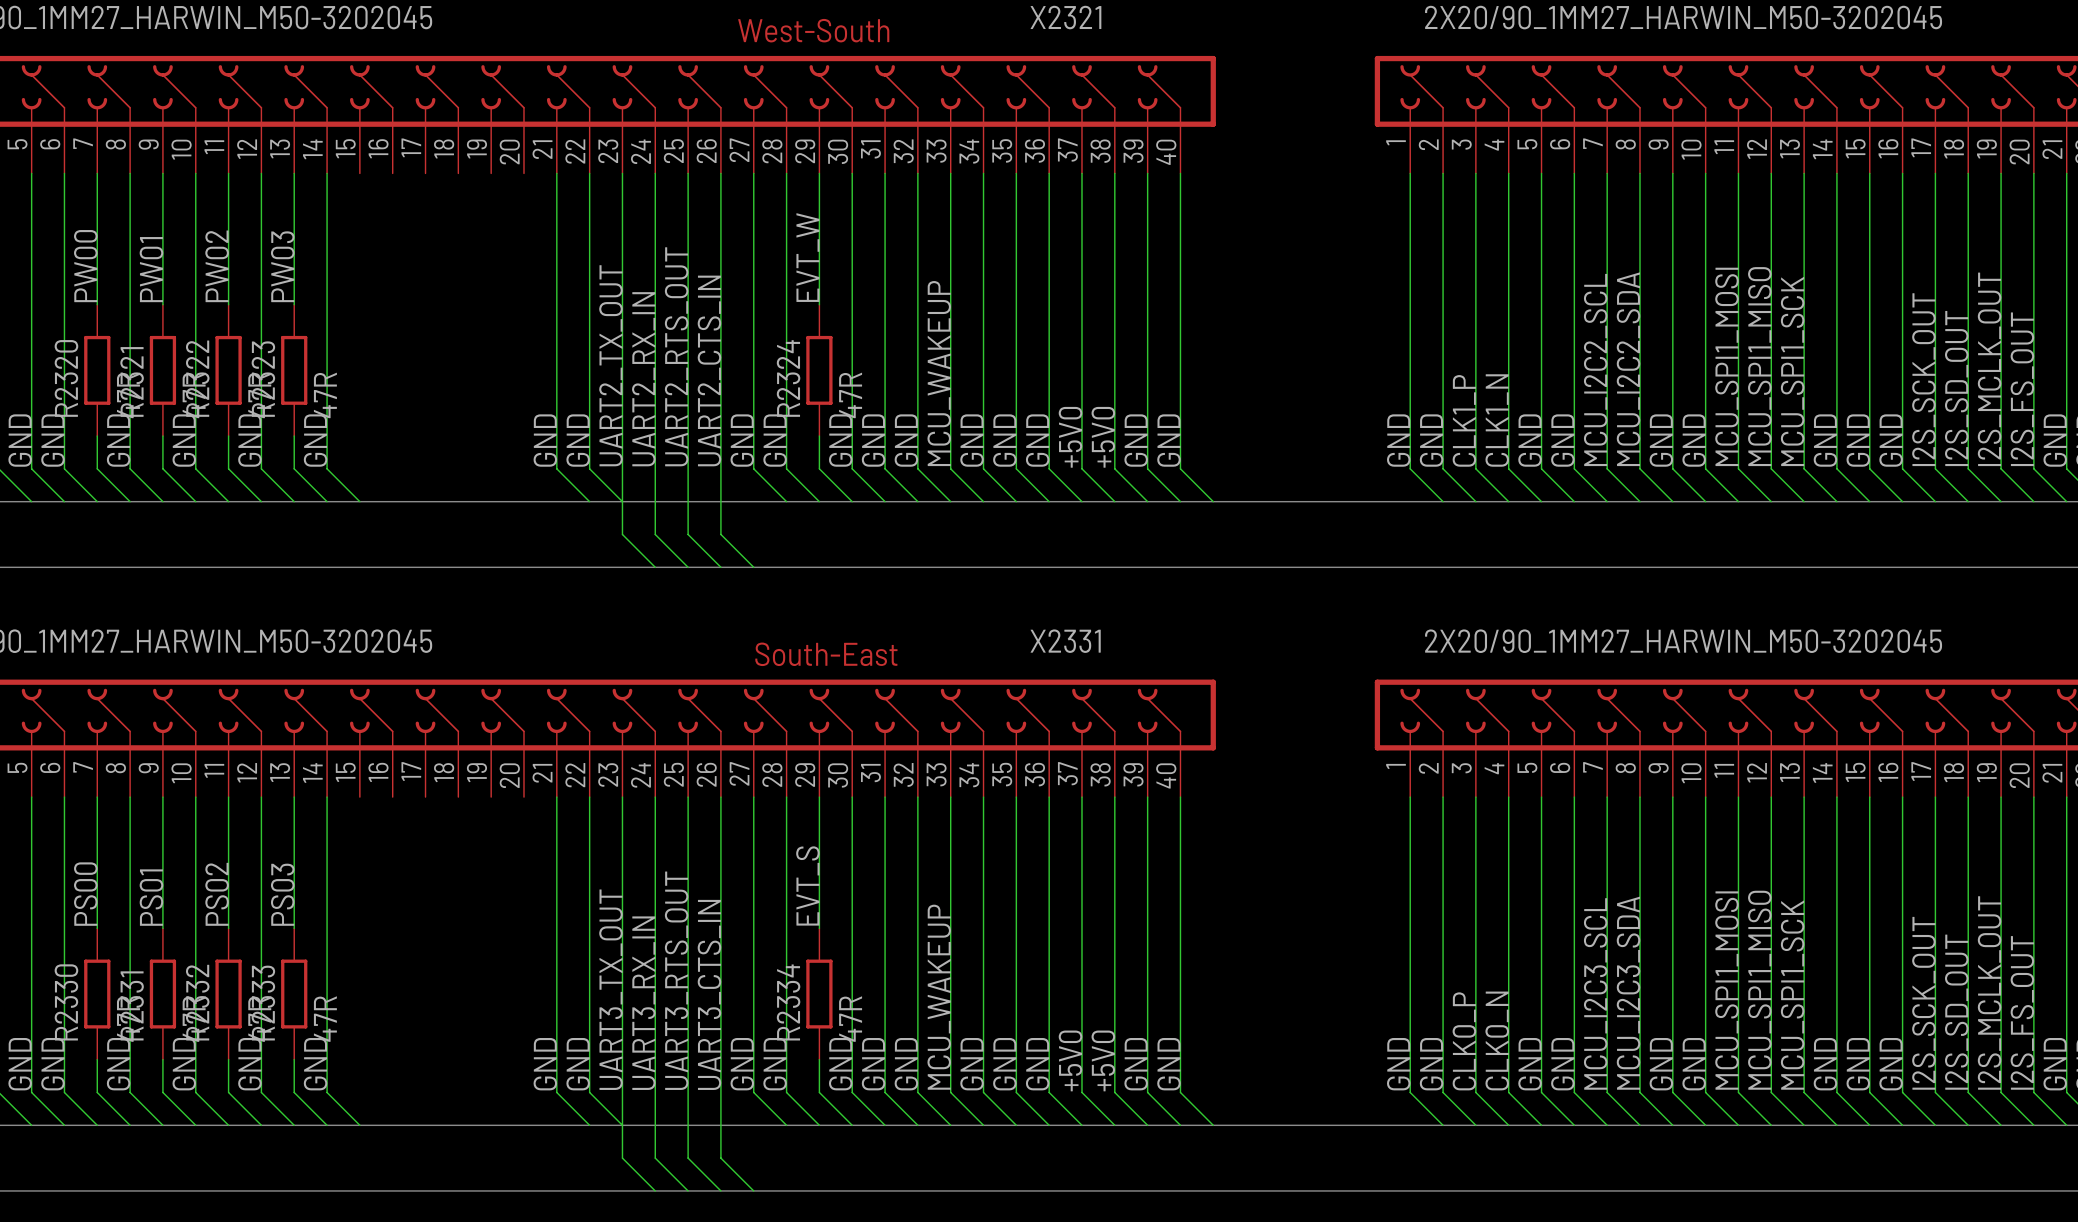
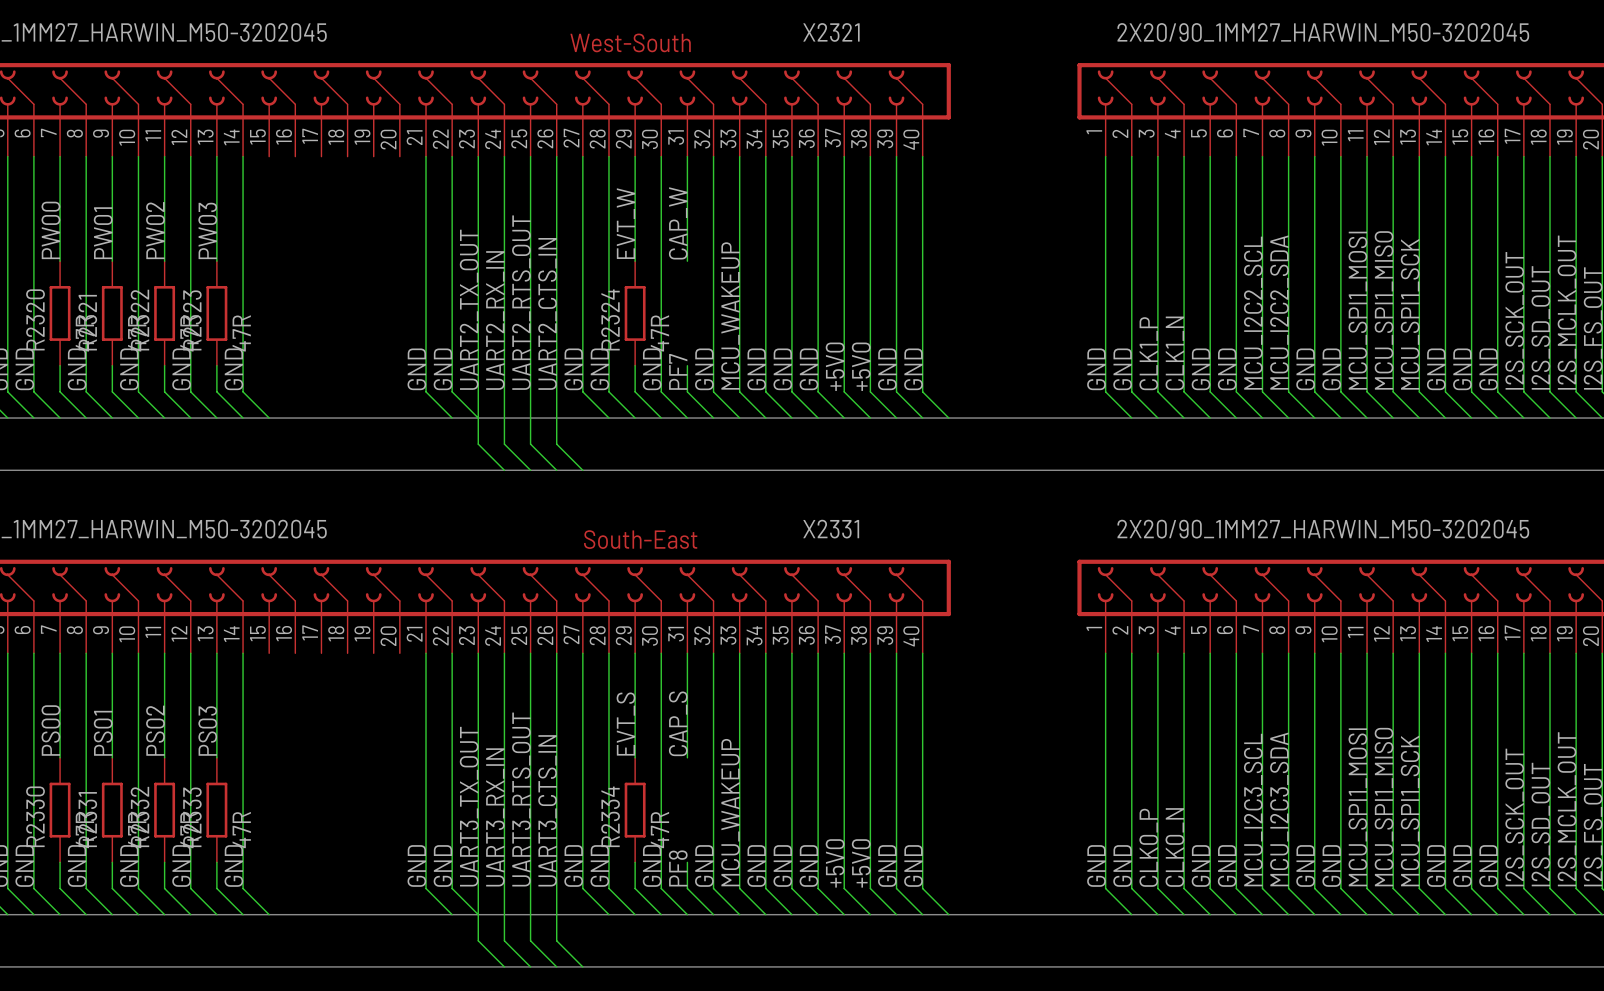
label: none -> CAP_W (678, 223)
wire: (885, 304) (885, 436) -> none
label: GND (873, 440) -> PF7 (678, 371)
label: none -> CAP_S (678, 723)
wire: (885, 928) (885, 1059) -> none
label: GND (873, 1064) -> PF8 (678, 868)

